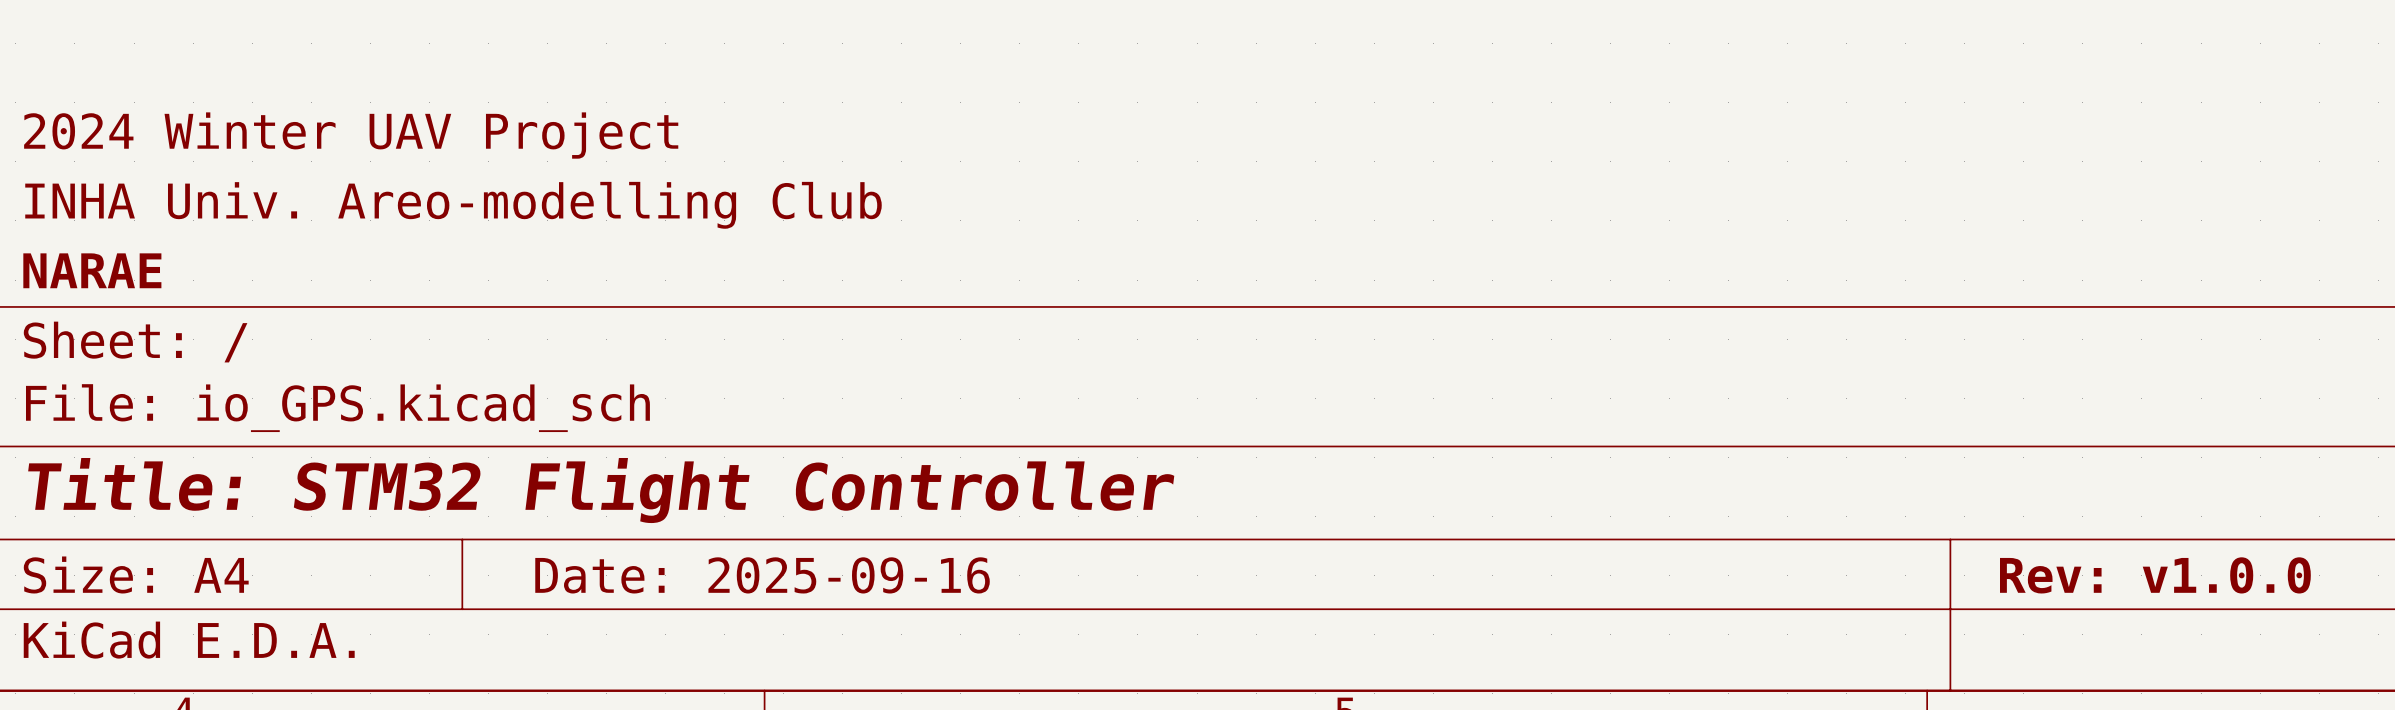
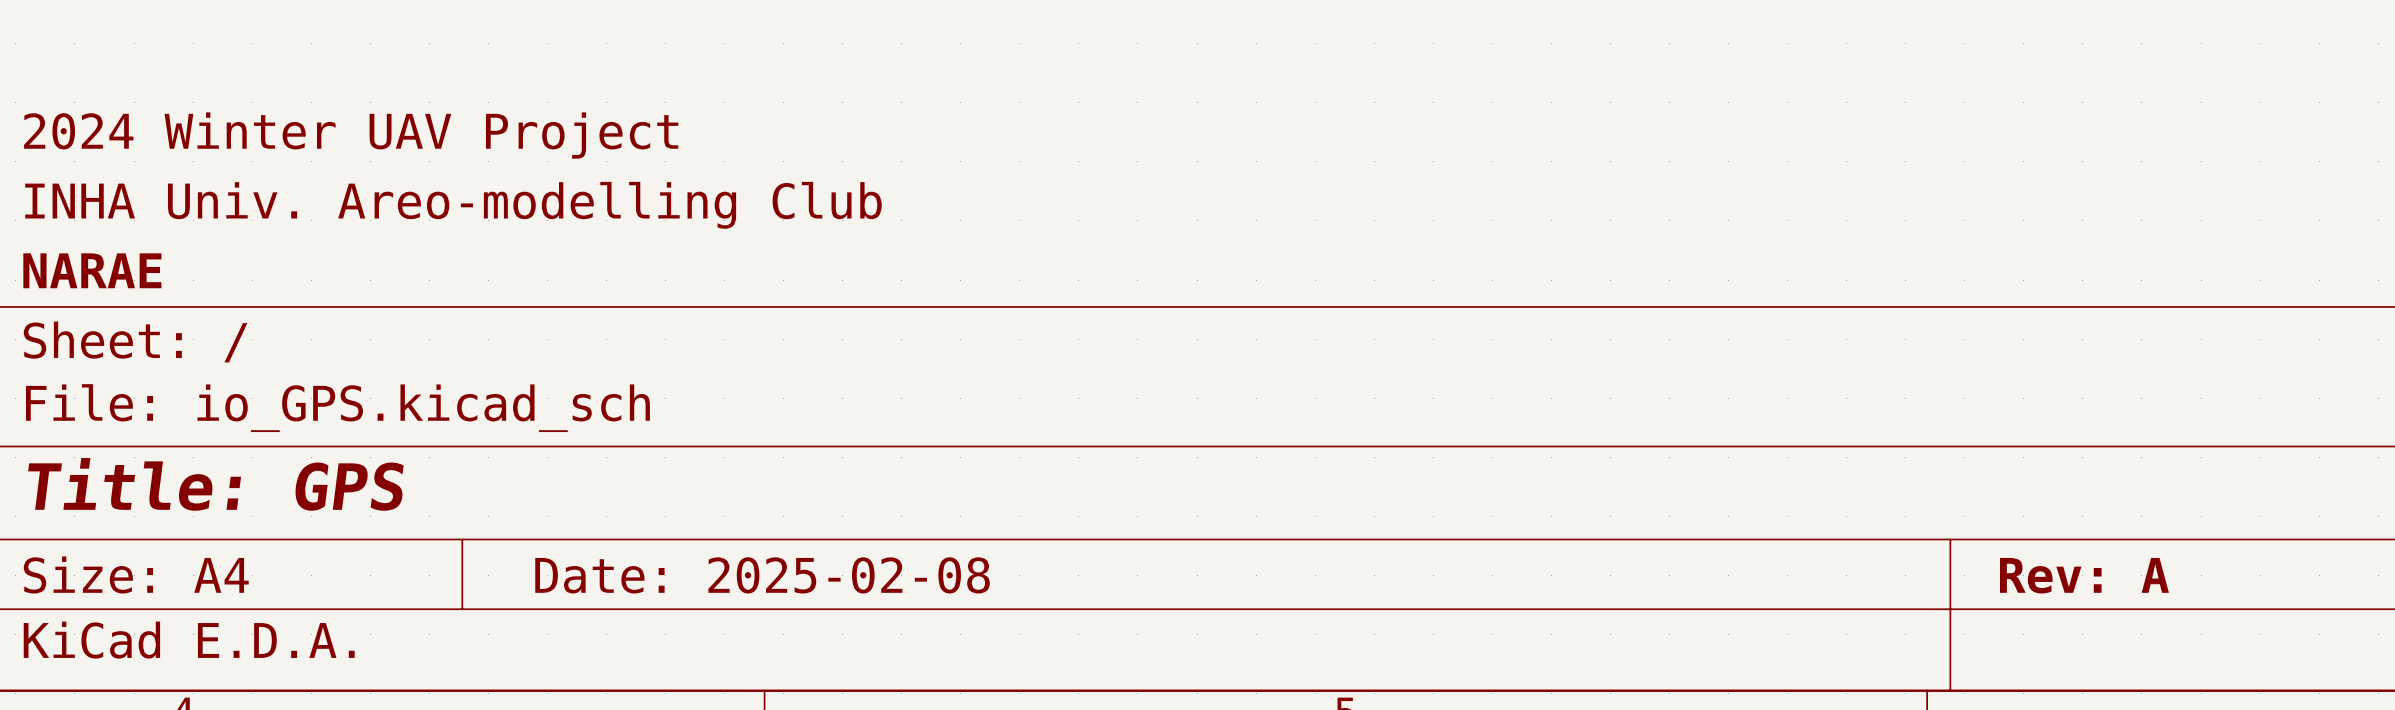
title block: Title: STM32 Flight Controller (601, 490) -> Title: GPS (215, 484)
title block: Date: 2025-09-16 (762, 575) -> Date: 2025-02-08 (762, 575)
title block: Rev: v1.0.0 (2155, 575) -> Rev: A (2084, 575)

